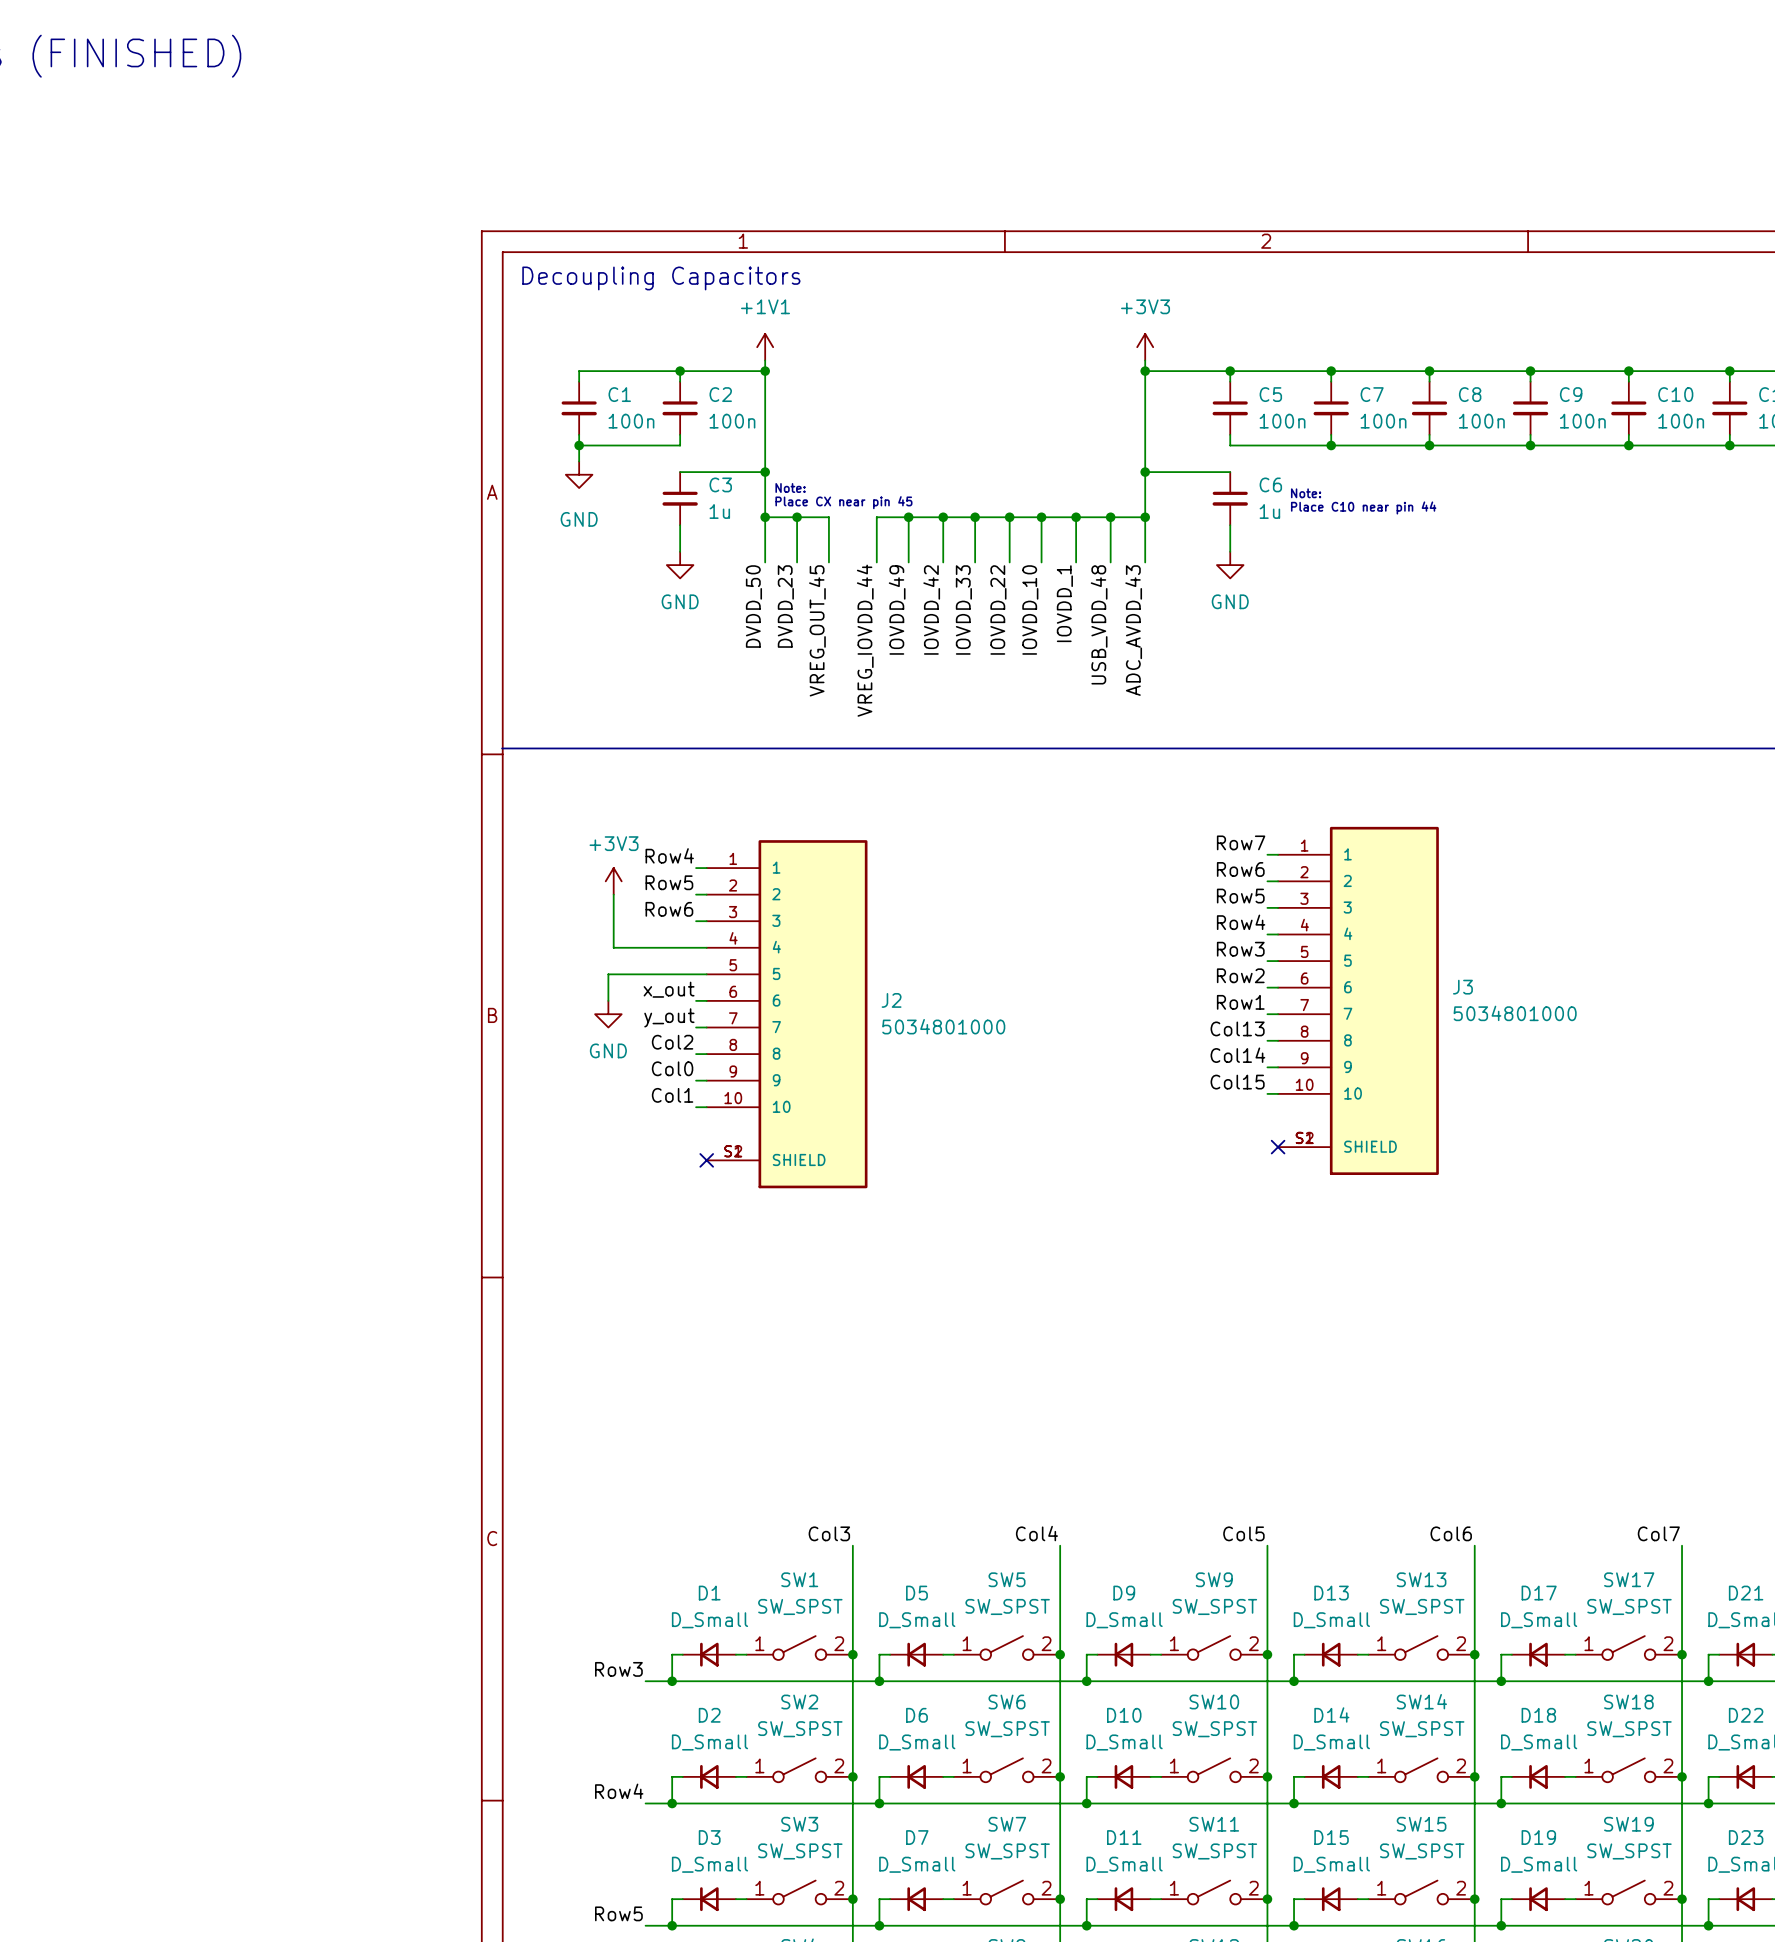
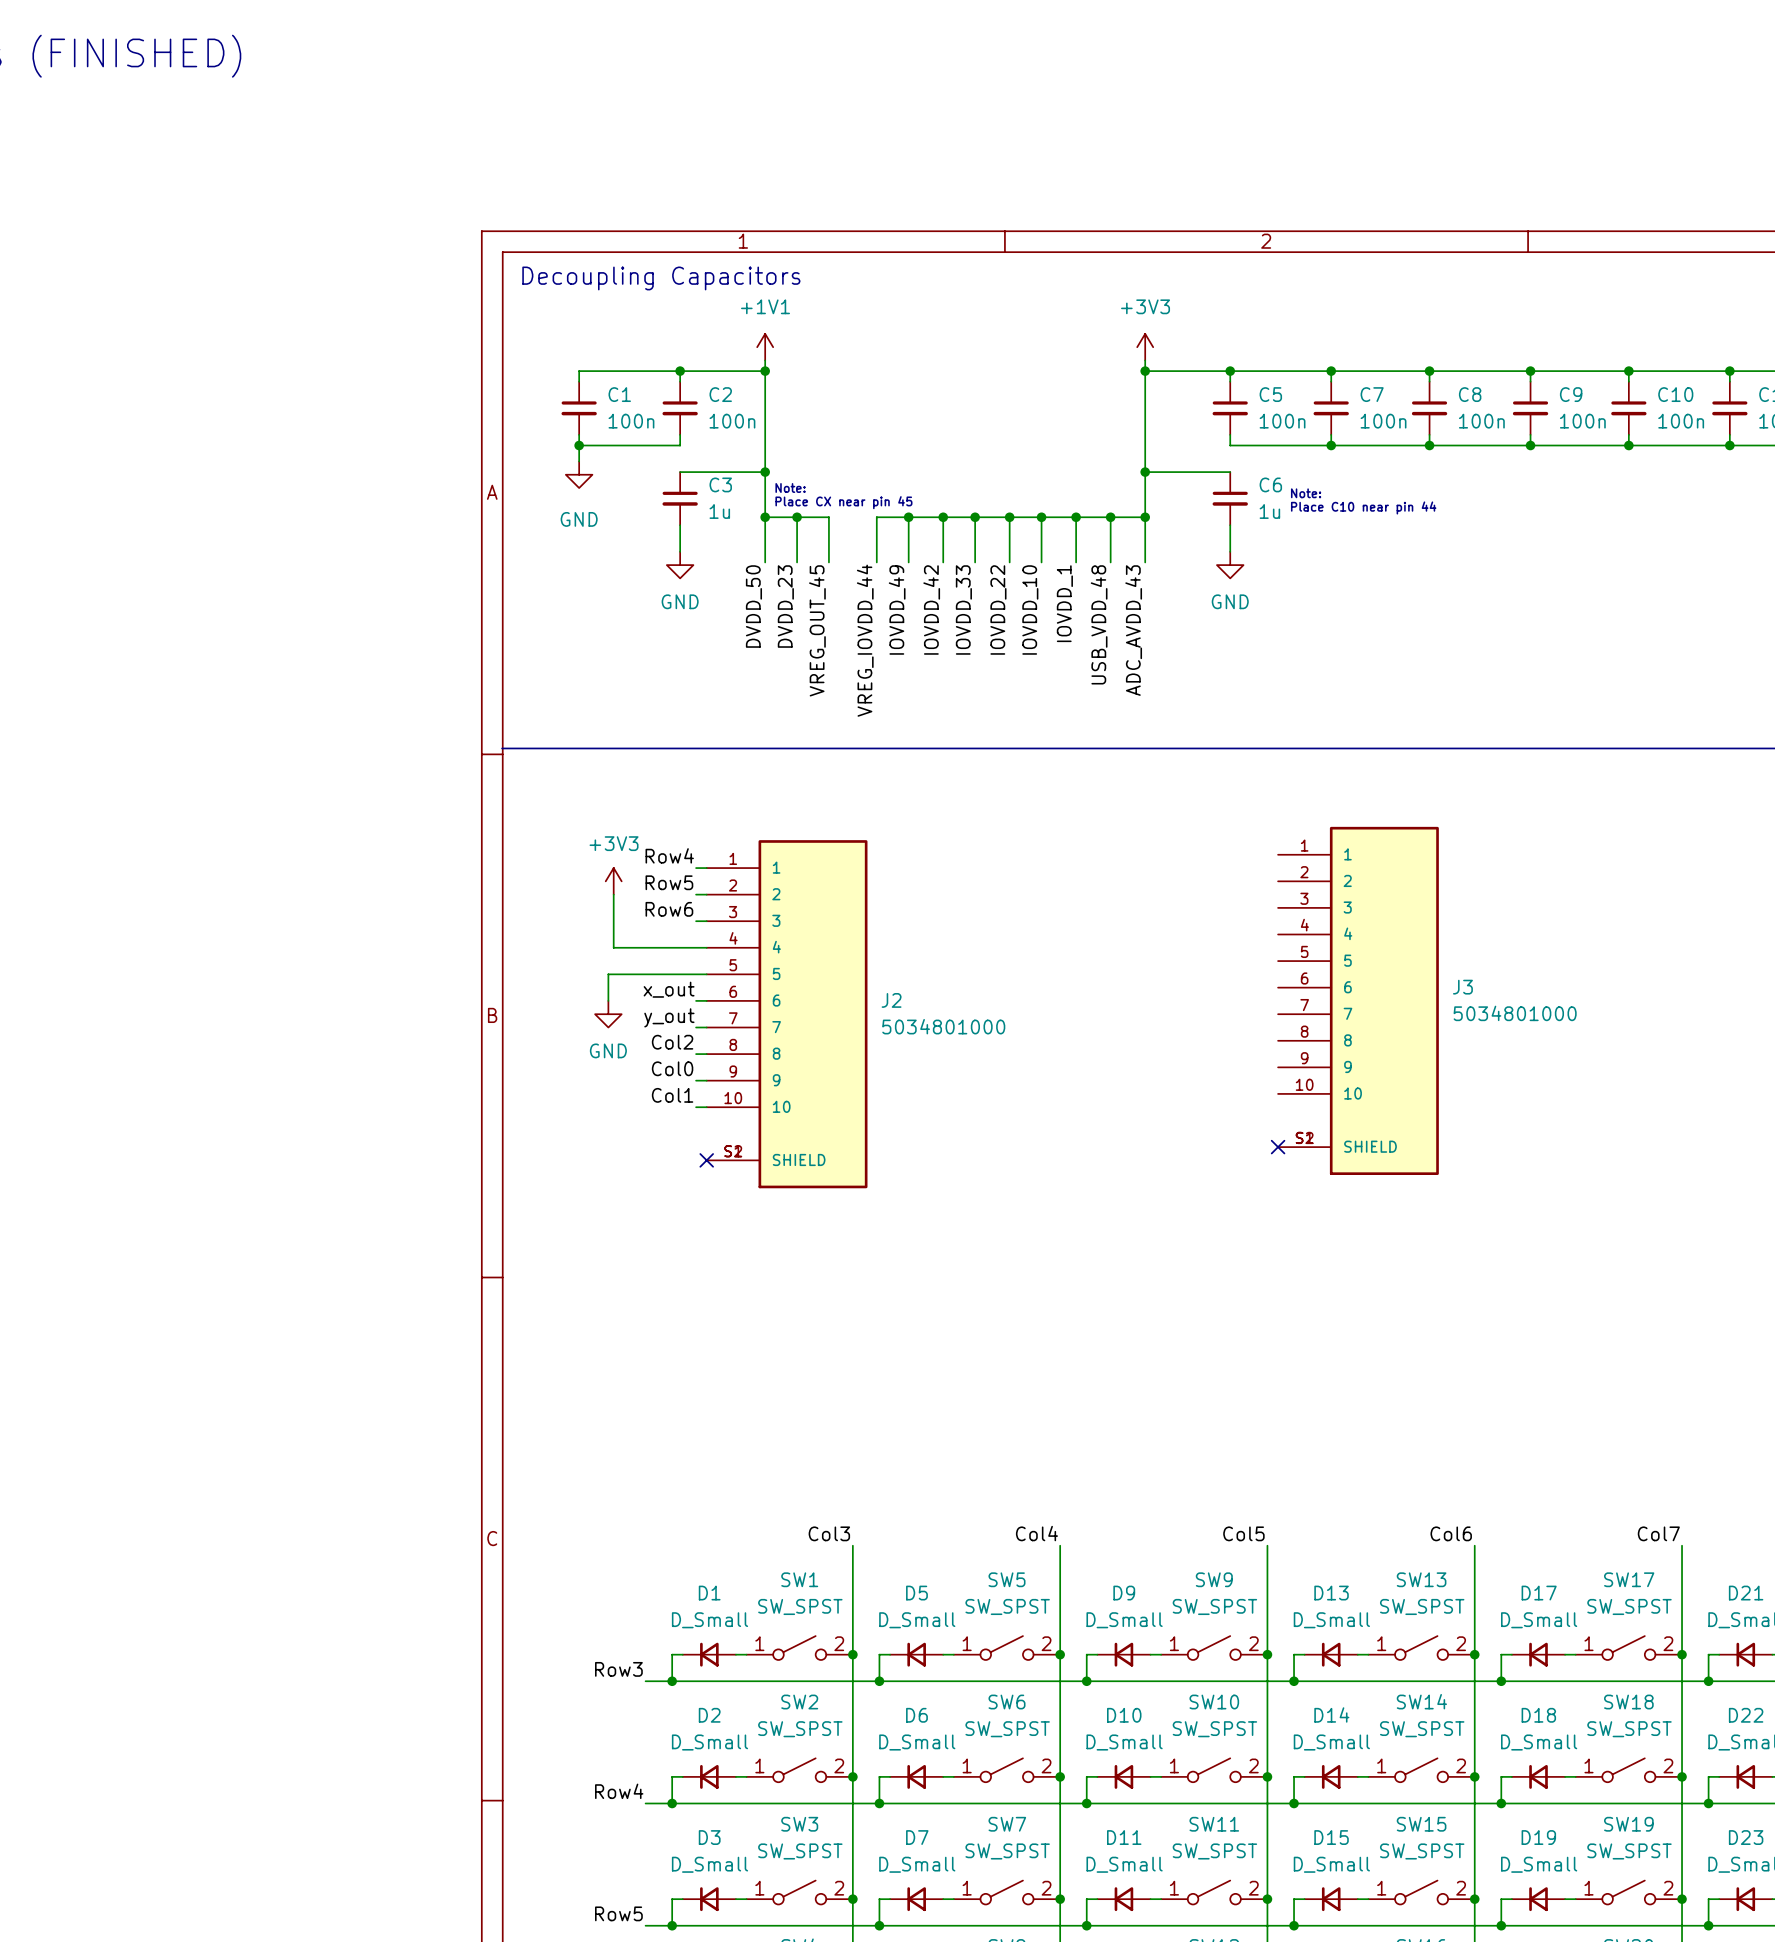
label: Row7 (1241, 842) -> none
wire: (1267, 854) (1278, 854) -> none
label: Row6 (1240, 869) -> none
wire: (1267, 881) (1278, 881) -> none
label: Row5 (1240, 896) -> none
wire: (1267, 907) (1278, 907) -> none
label: Row4 (1241, 922) -> none
wire: (1267, 934) (1278, 934) -> none
label: Row3 (1240, 949) -> none
wire: (1267, 961) (1278, 961) -> none
label: Row2 (1240, 975) -> none
wire: (1267, 987) (1278, 987) -> none
label: Row1 (1240, 1002) -> none
wire: (1267, 1014) (1278, 1014) -> none
label: Col13 (1237, 1028) -> none
wire: (1267, 1040) (1278, 1040) -> none
label: Col14 (1237, 1055) -> none
wire: (1267, 1067) (1278, 1067) -> none
label: Col15 (1237, 1082) -> none
wire: (1267, 1093) (1278, 1093) -> none

